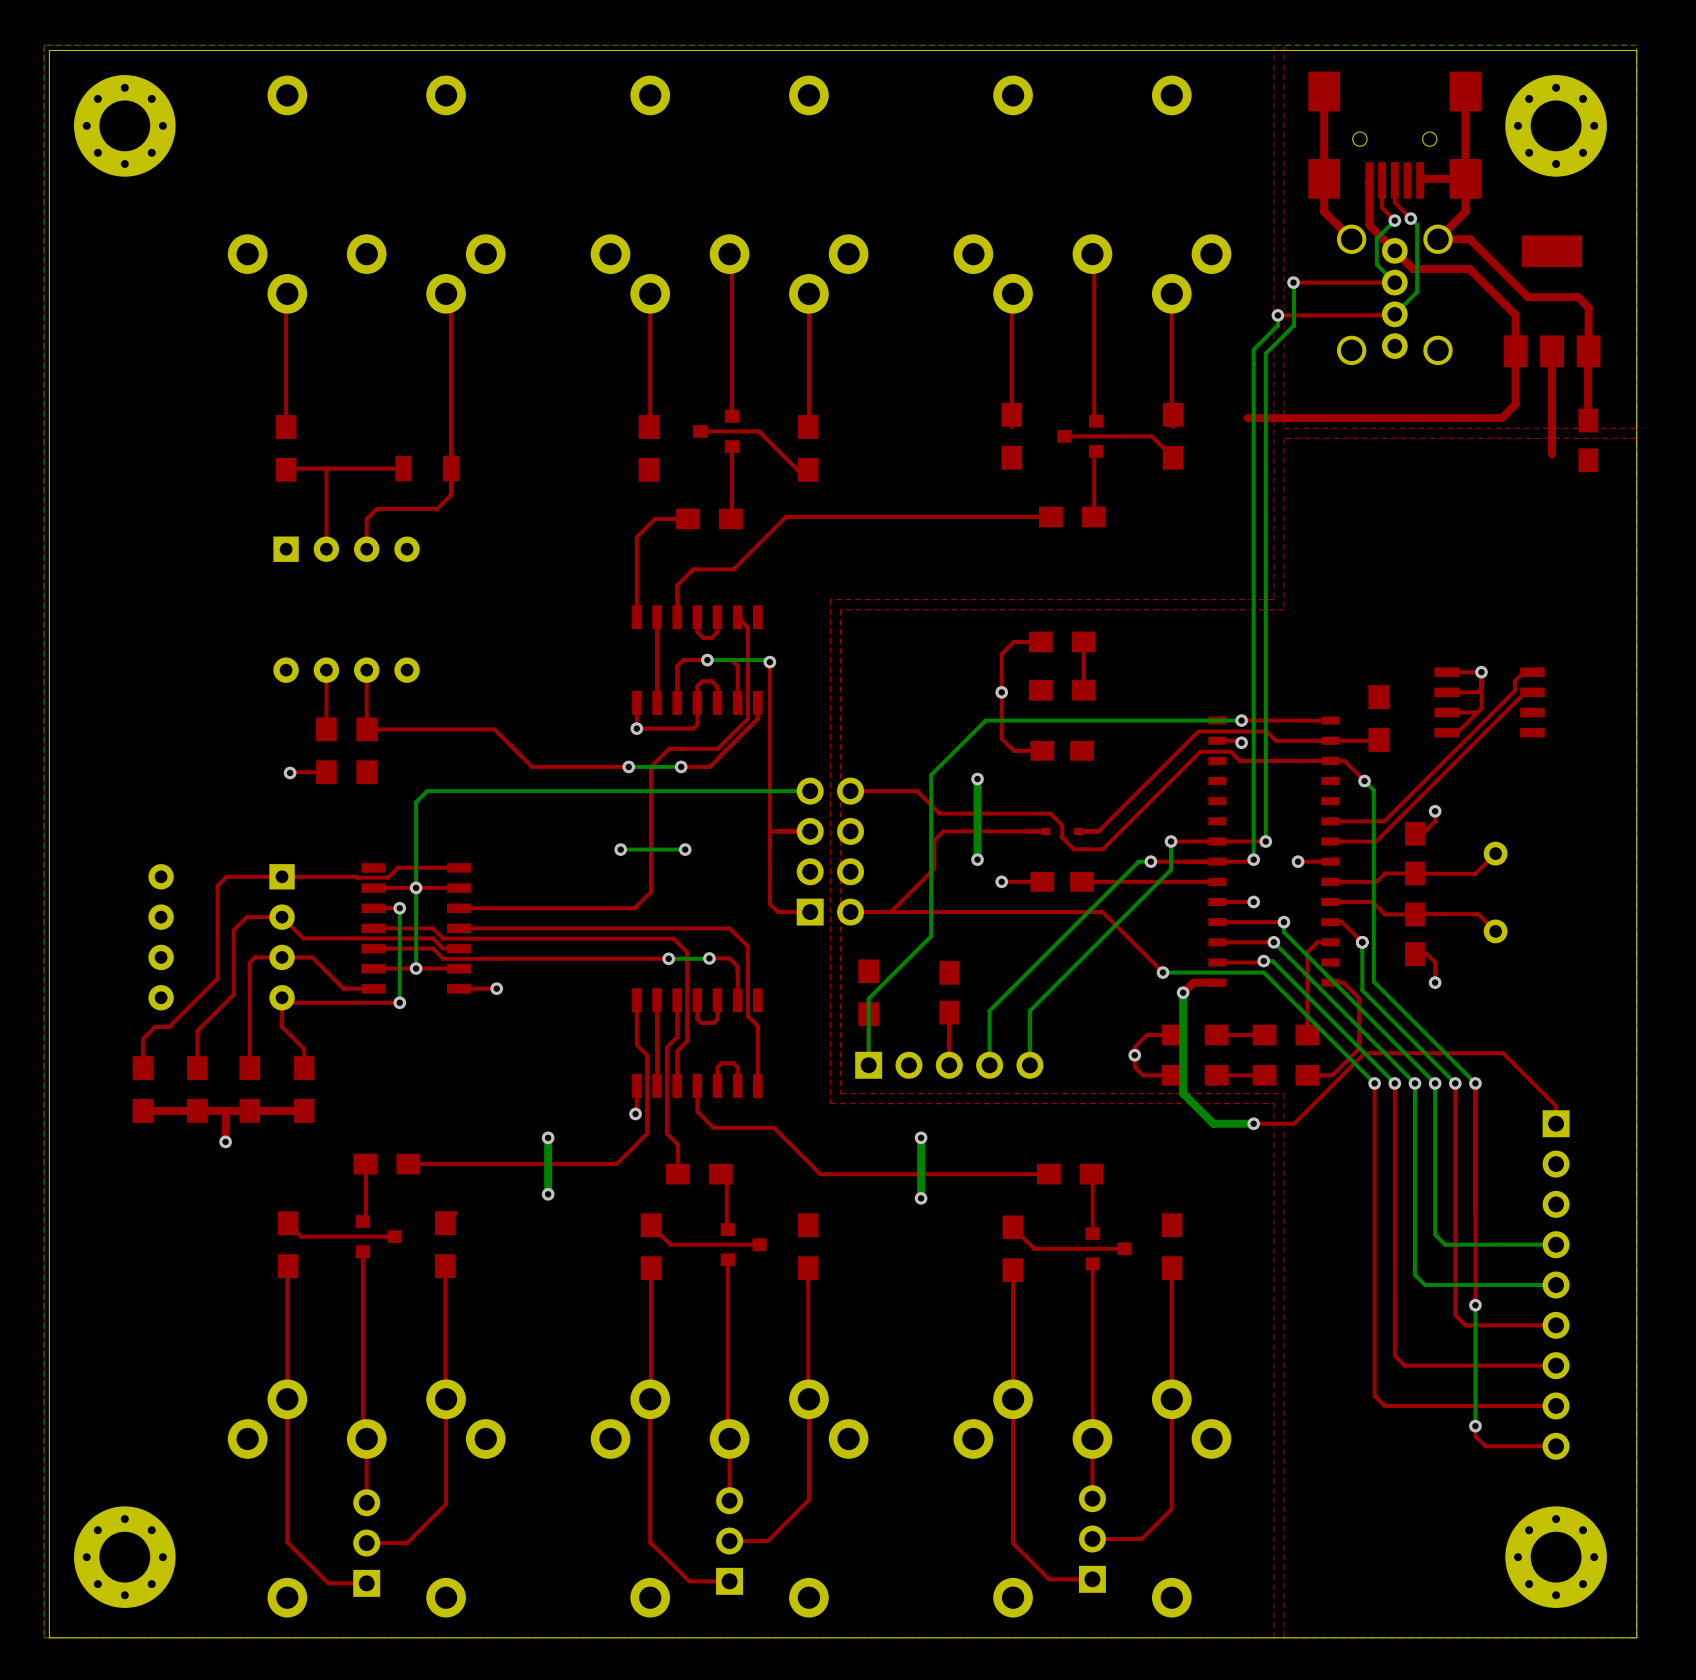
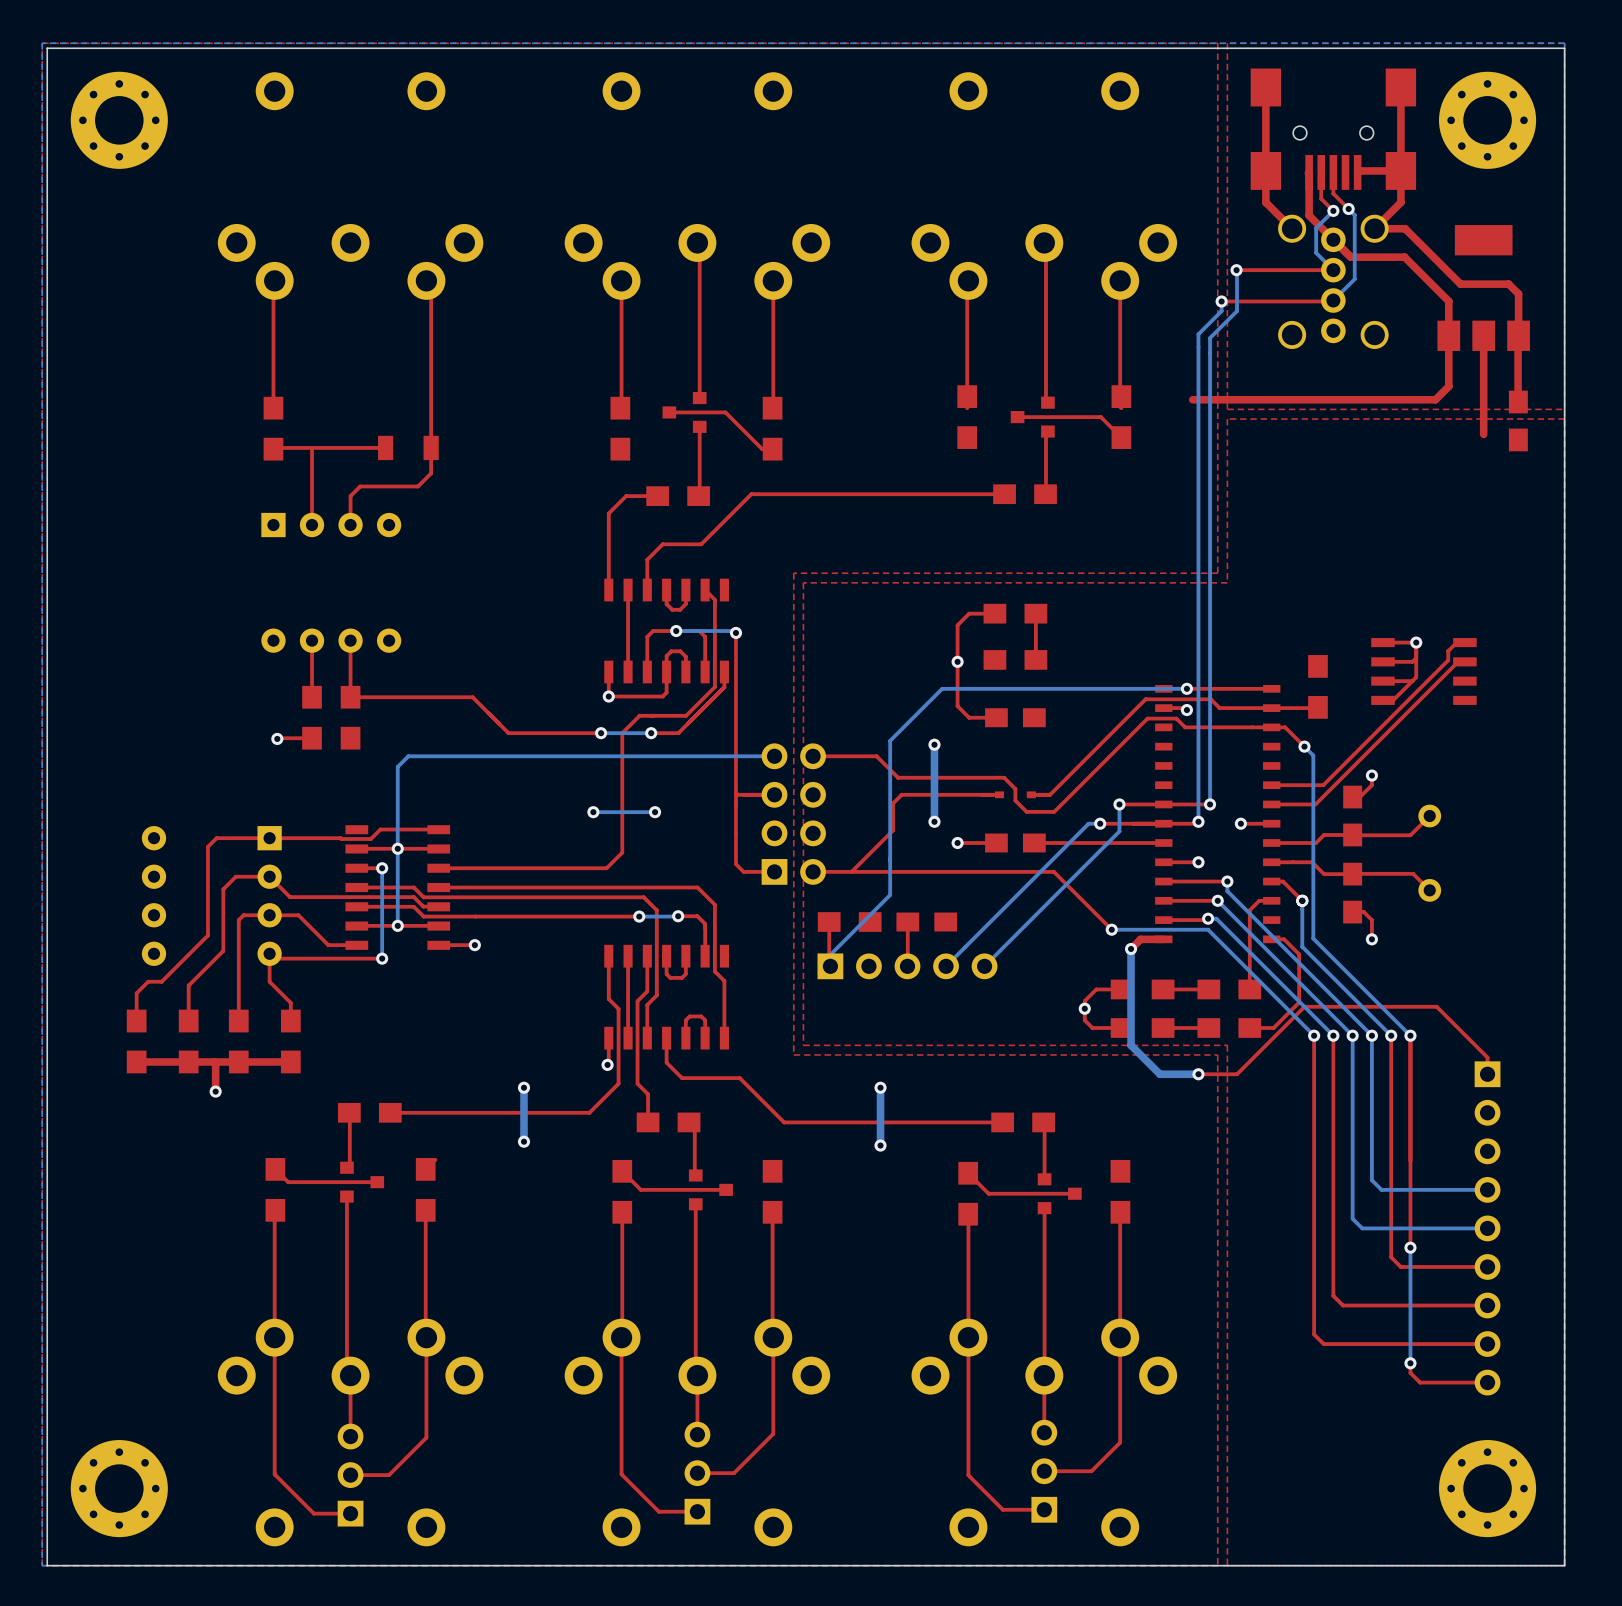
top track: none -> (829, 922) (830, 966)
top track: none -> (907, 922) (907, 966)
part rotation: 0° (868, 992) -> 90° clockwise (849, 922)
part rotation: 0° (949, 992) -> 90° clockwise (926, 922)
bottom track: (868, 998) (868, 1065) -> none
bottom track: (989, 1010) (989, 1065) -> none
bottom track: (1029, 1010) (1029, 1065) -> none
top track: (948, 1016) (949, 1067) -> none
part position: (949, 1065) -> (907, 966)

